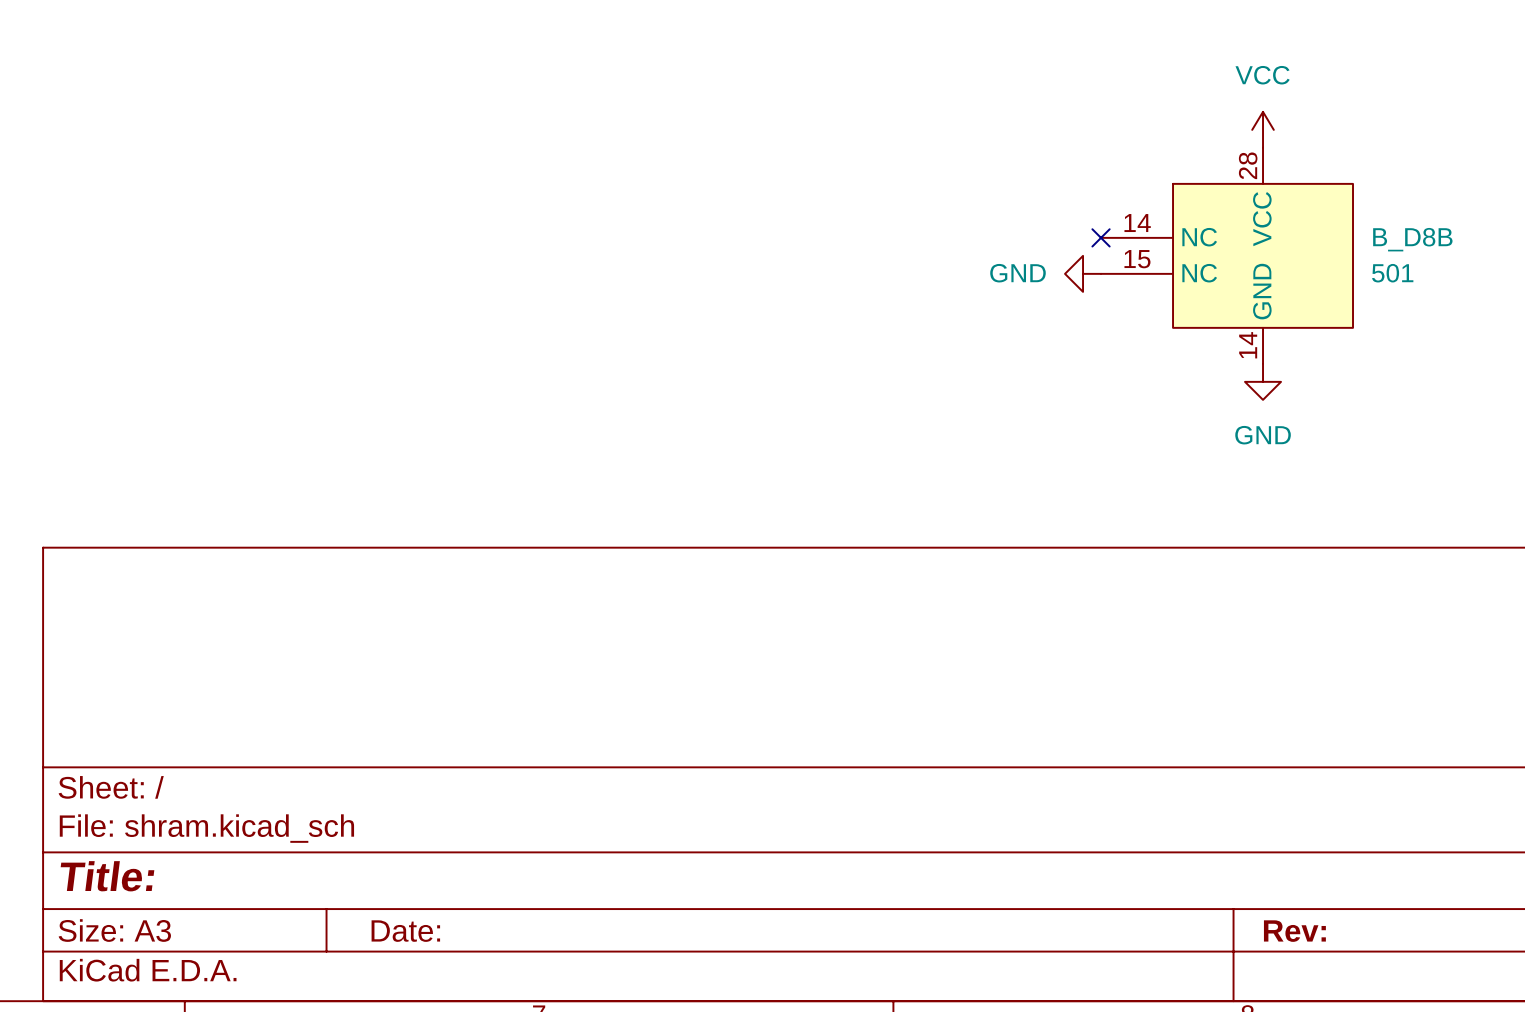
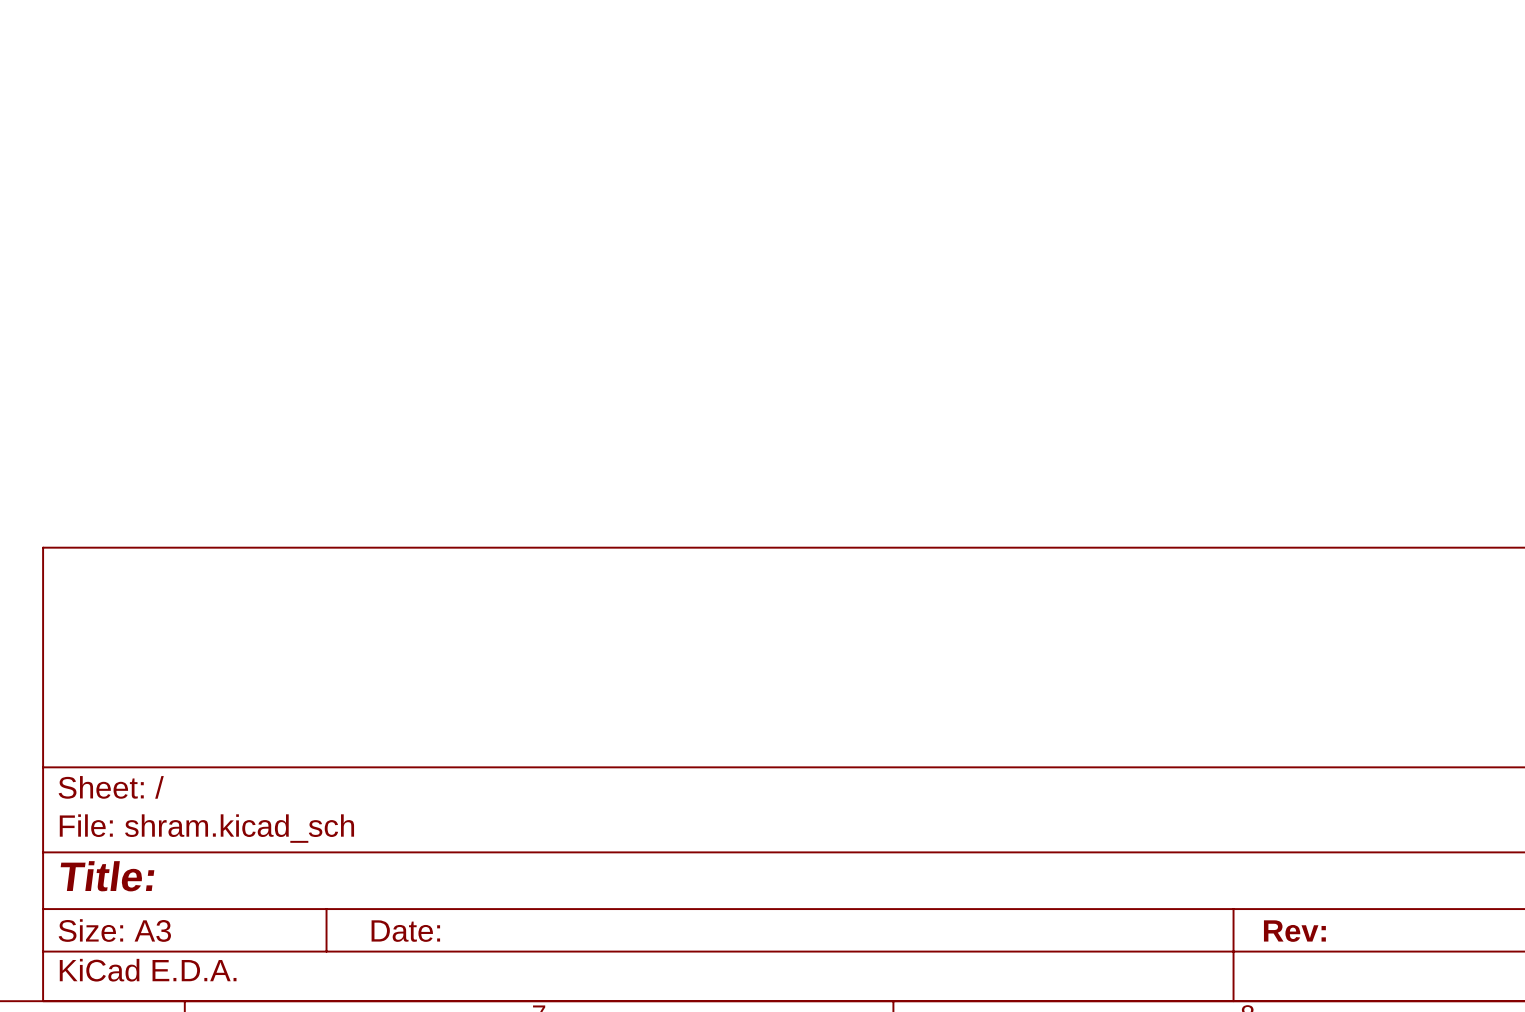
power symbol: VCC (1263, 129) -> none
no-connect mark: (1101, 237) -> none
B_D8B: 501 (1227, 255) -> none
power symbol: GND (1083, 273) -> none
power symbol: GND (1263, 381) -> none

